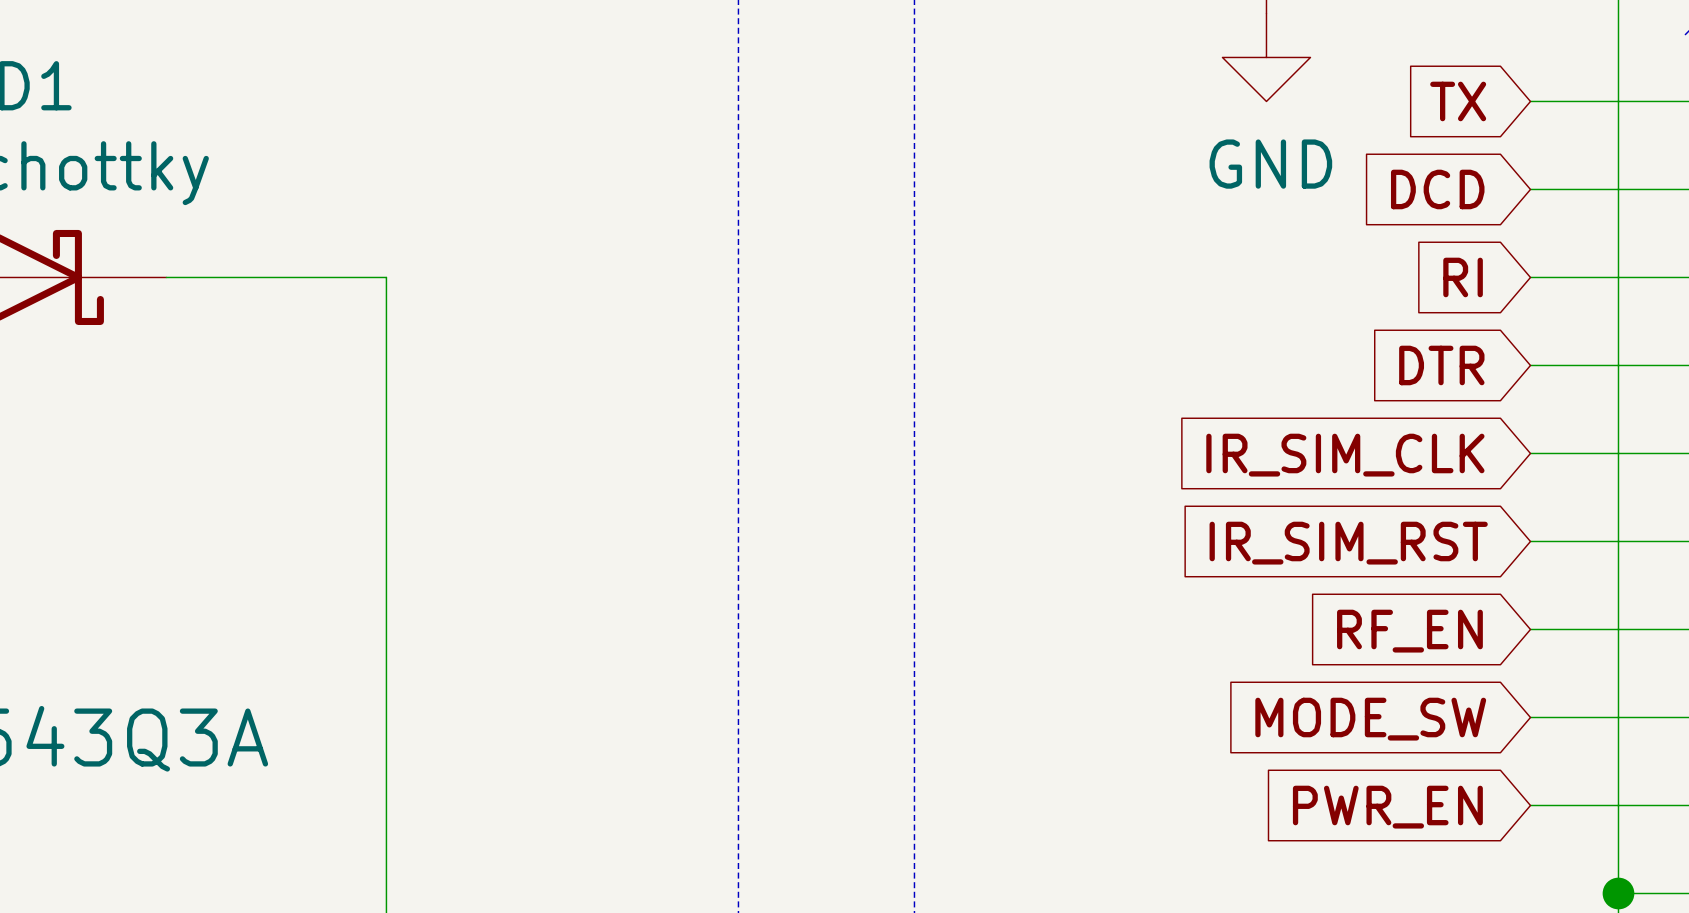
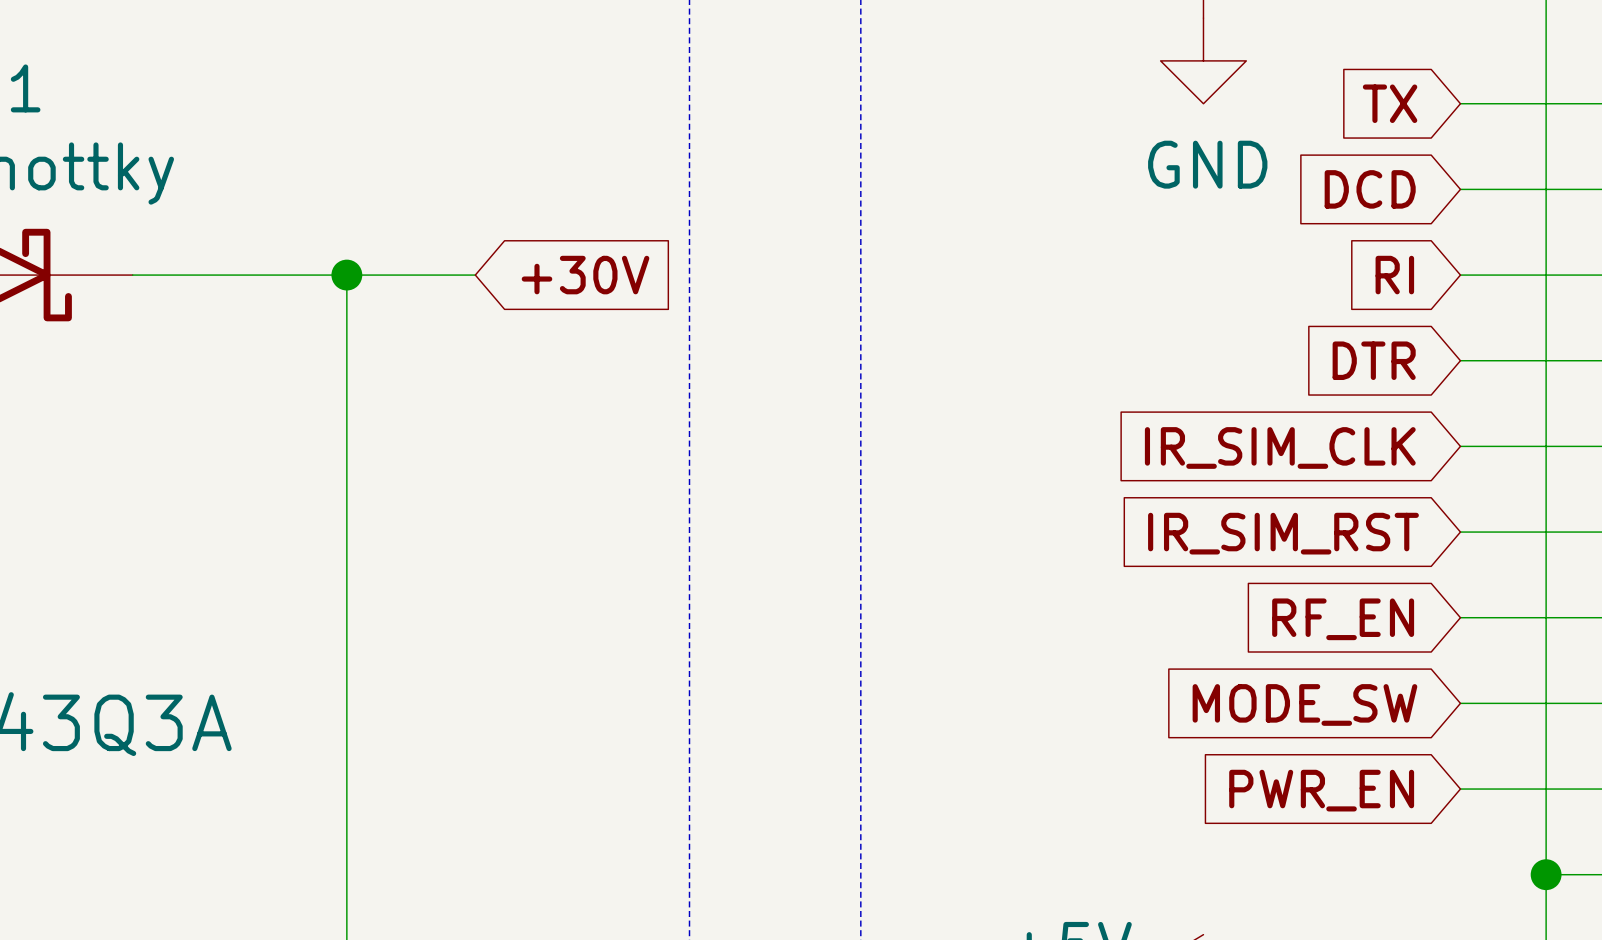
wire: none -> (346, 275) (475, 275)
junction: none -> (346, 275)
global label: none -> +30V (585, 275)

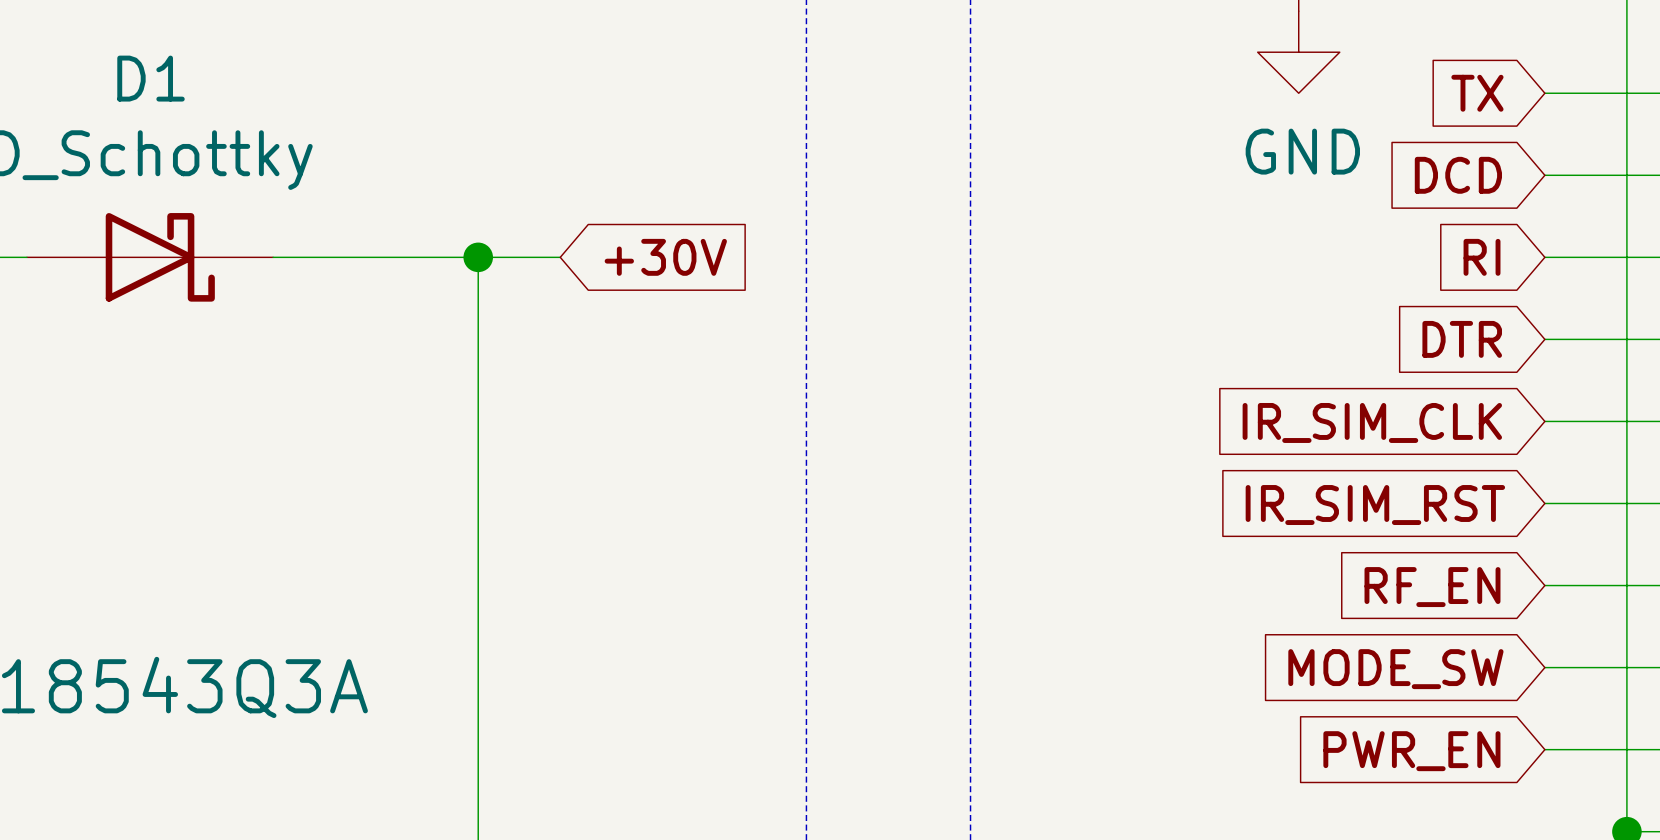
wire: (432, 275) (475, 275) -> none
global label position: +30V (585, 275) -> +30V (665, 257)

